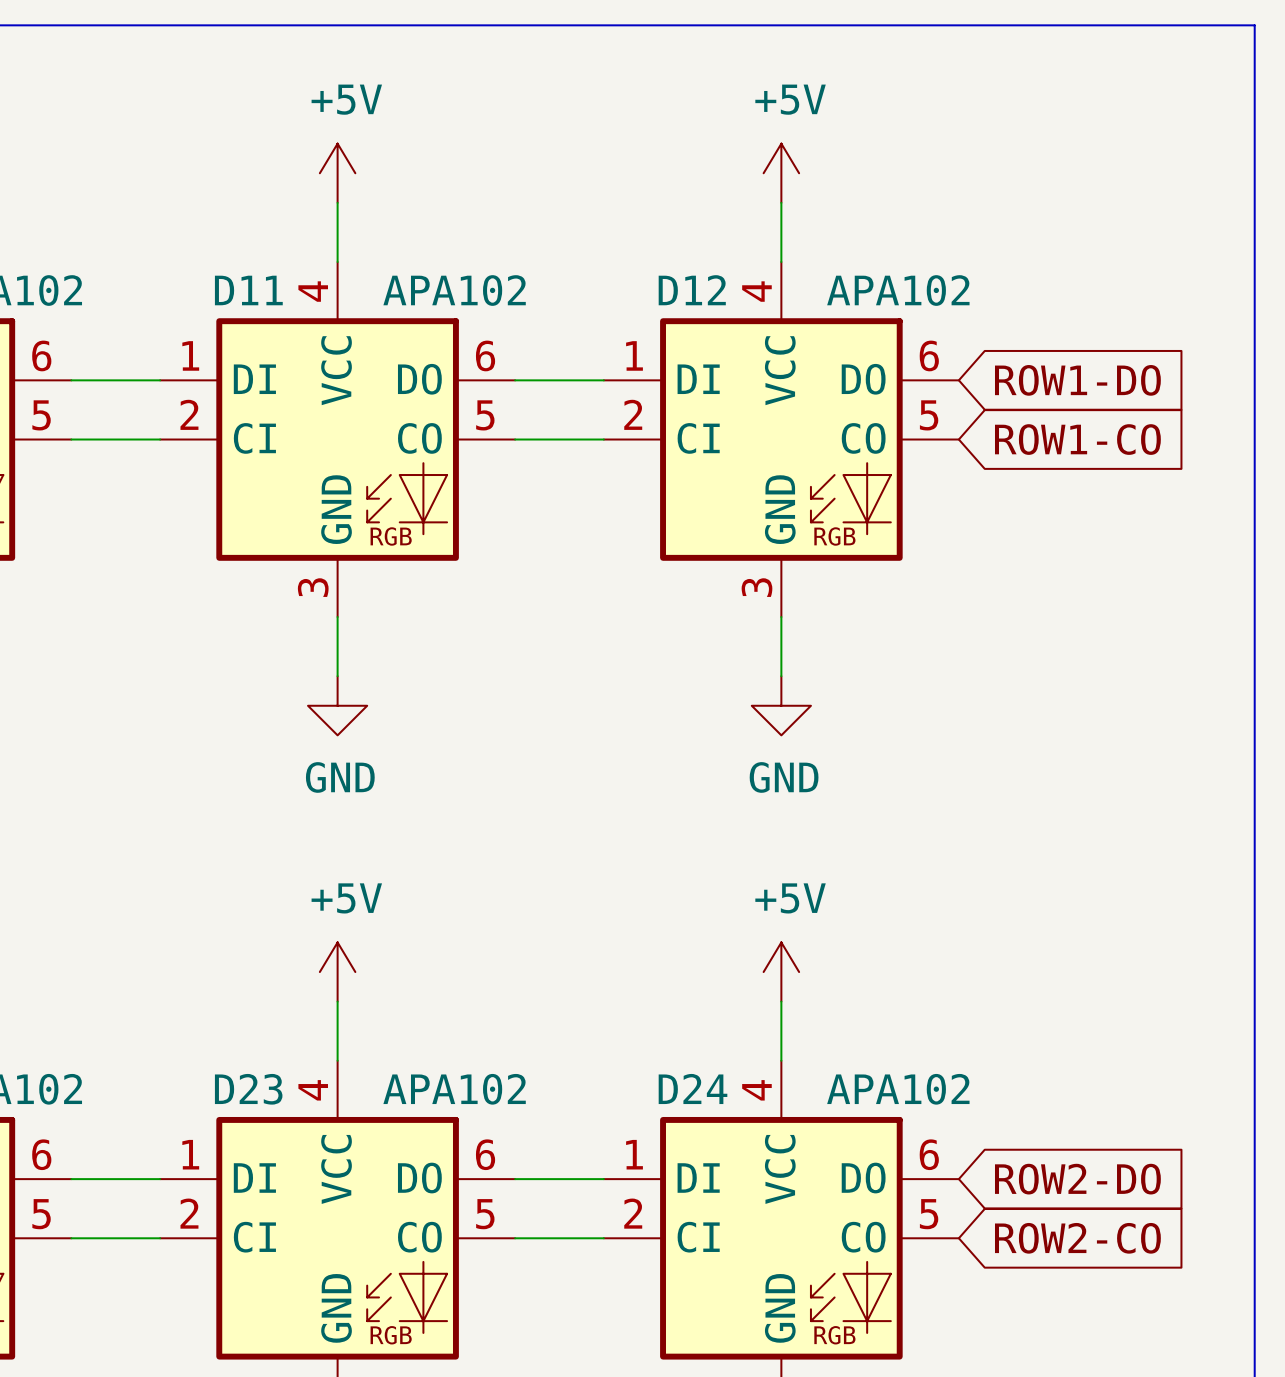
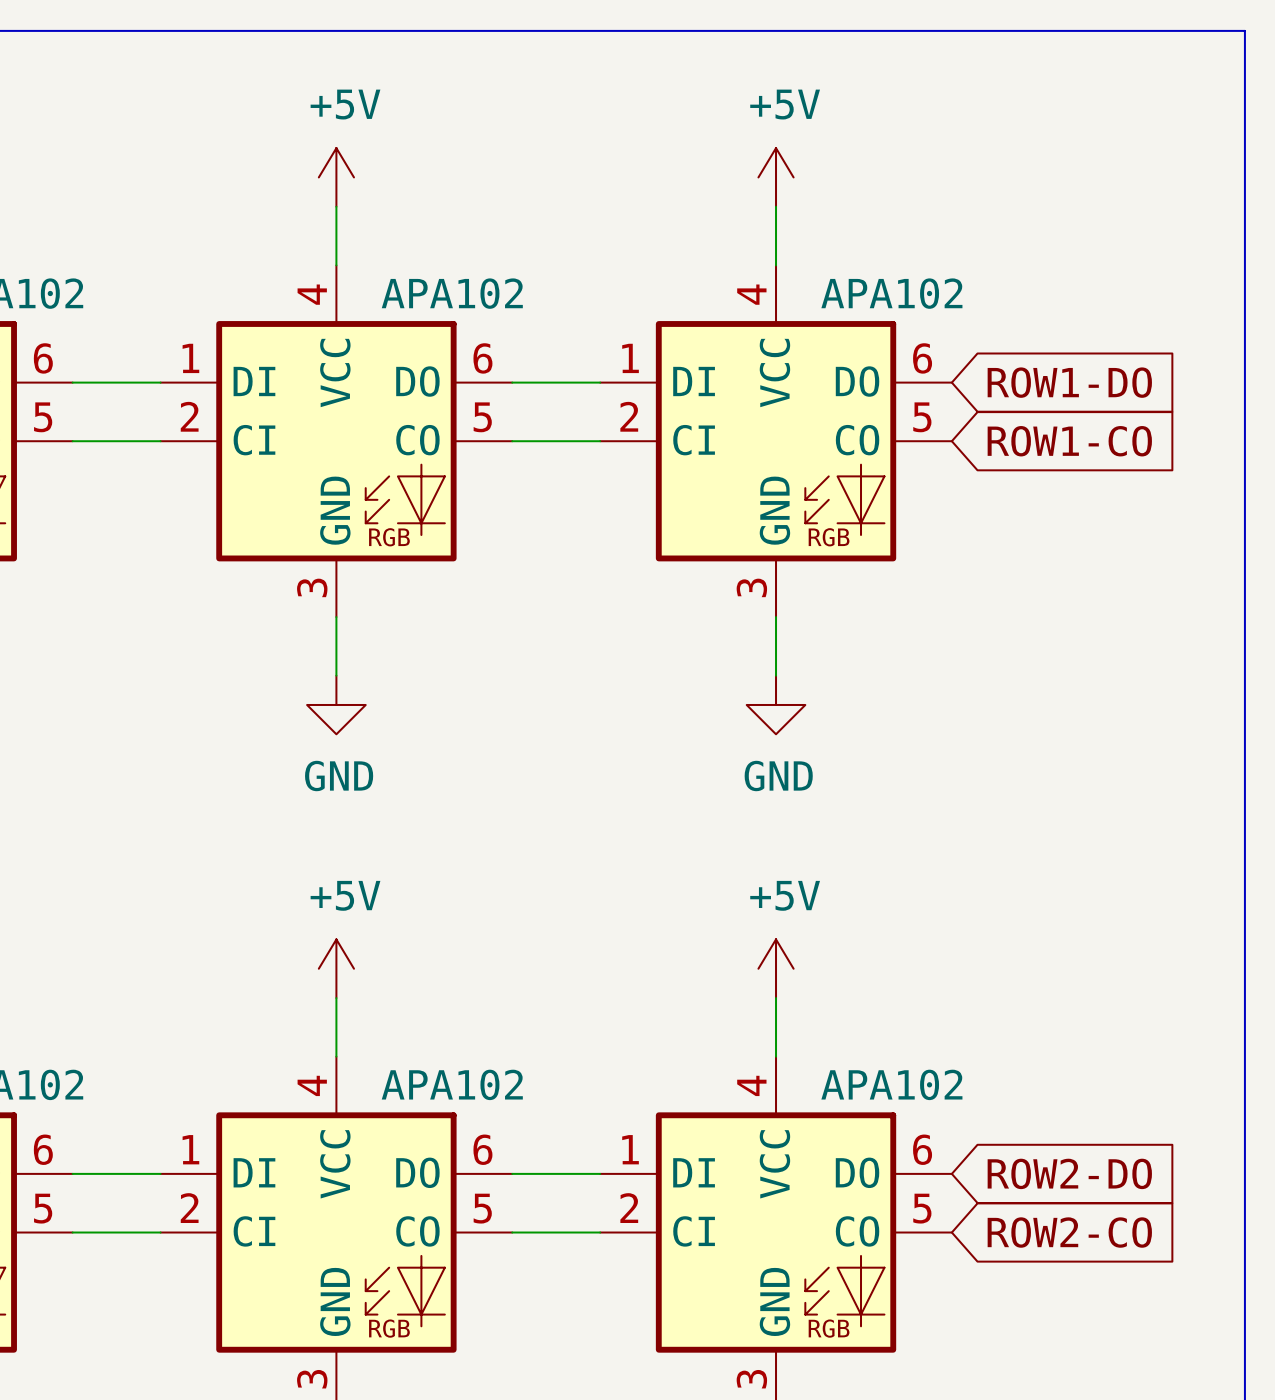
D11 name: D11 (248, 290) -> none
D12 name: D12 (692, 290) -> none
D24 name: D24 (693, 1088) -> none
D23 name: D23 (248, 1089) -> none

